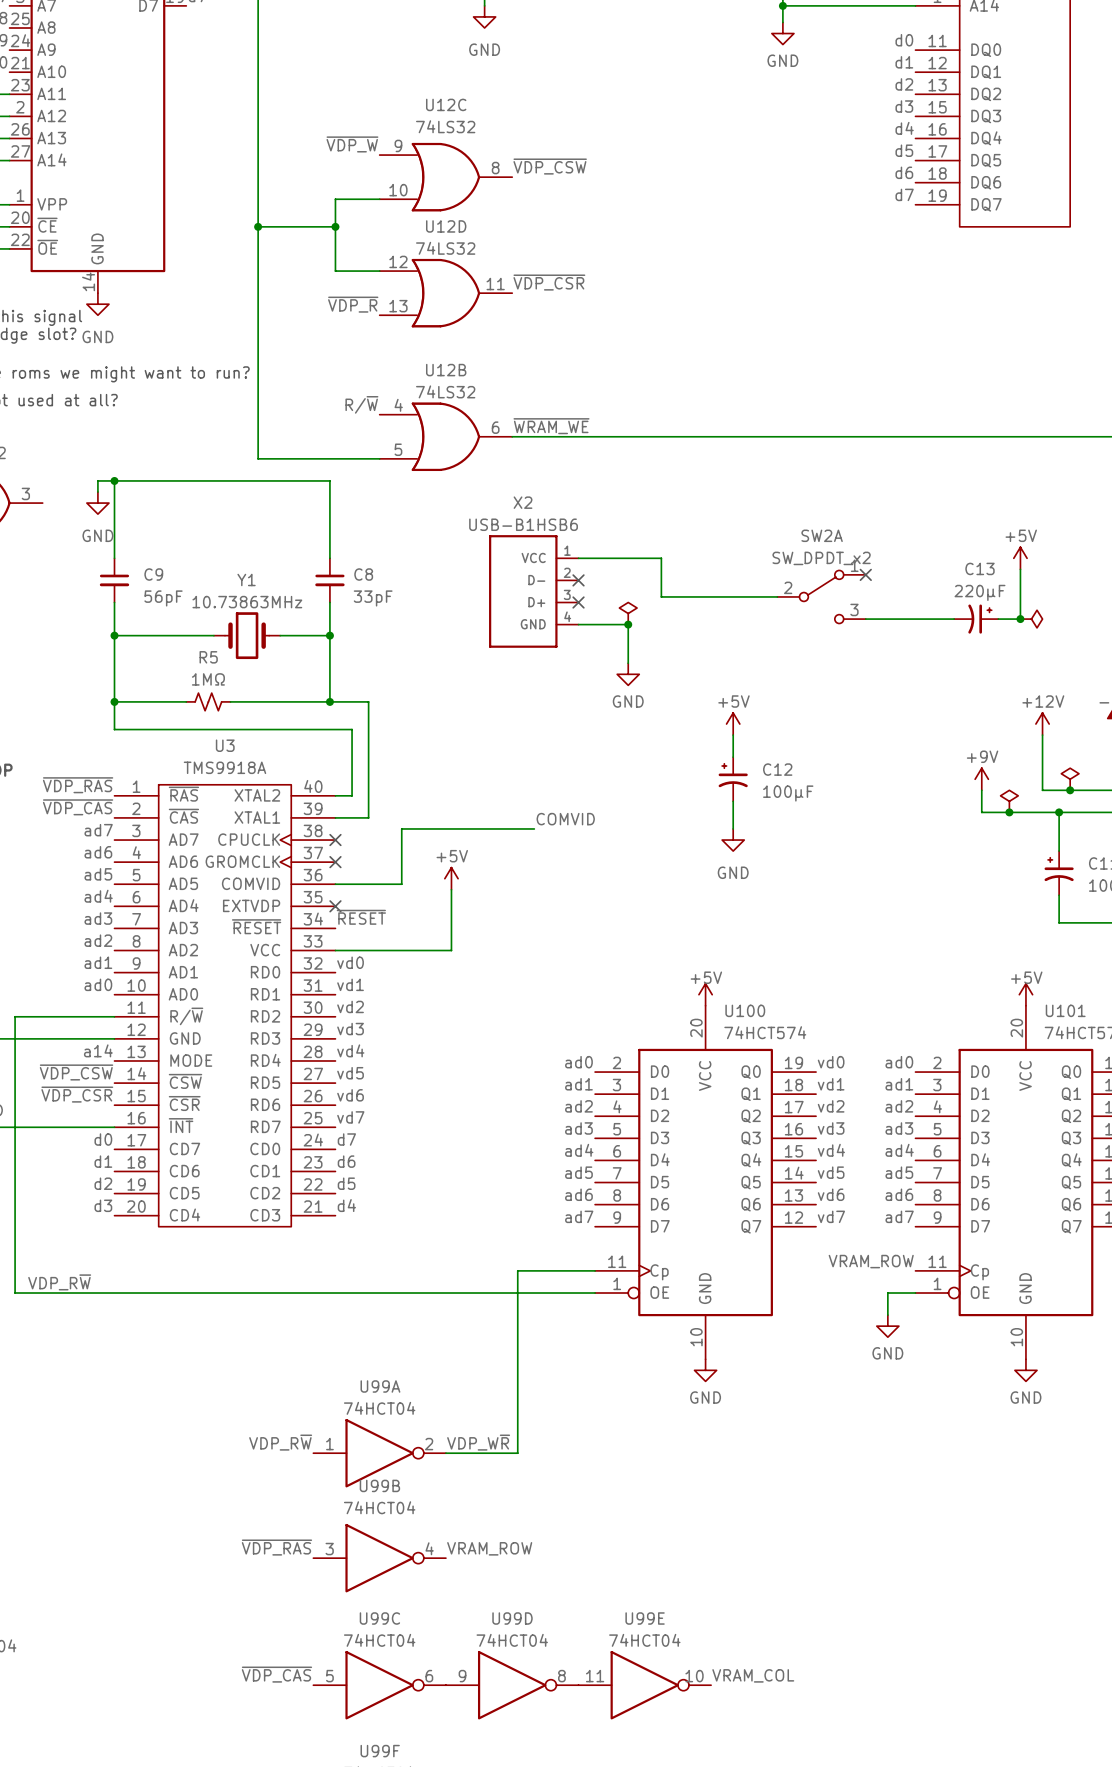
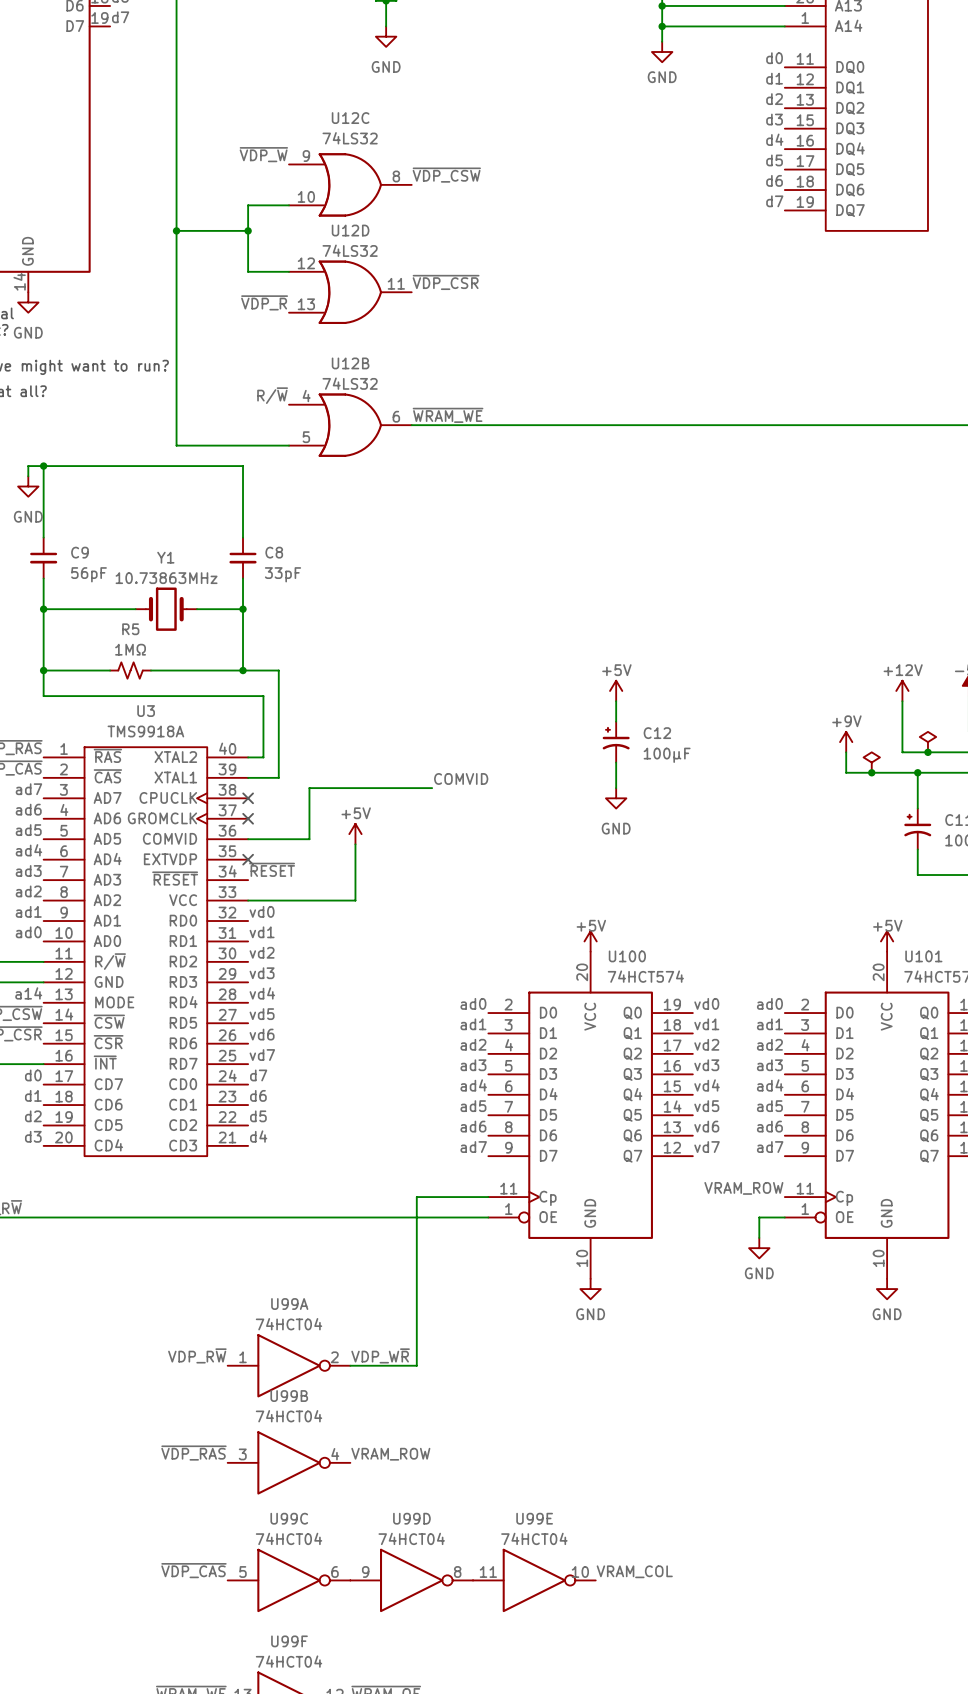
wire: (578, 558) (661, 558) (661, 596) (777, 596) -> none
power symbol: +5V (1020, 558) -> none
wire: (1020, 569) (1020, 619) (998, 619) -> none
no-connect mark: (865, 574) -> none
no-connect mark: (578, 580) -> none
X2: USB-B1HSB6 (533, 591) -> none
SW2A: SW_DPDT_x2 (821, 596) -> none
no-connect mark: (578, 602) -> none
power symbol: (628, 613) -> none
wire: (865, 619) (954, 619) -> none
C13: 220µF (976, 619) -> none
junction: (1020, 619) -> none
power symbol: (1031, 619) -> none
wire: (578, 624) (628, 624) (628, 663) -> none
junction: (628, 624) -> none
power symbol: GND (628, 674) -> none

